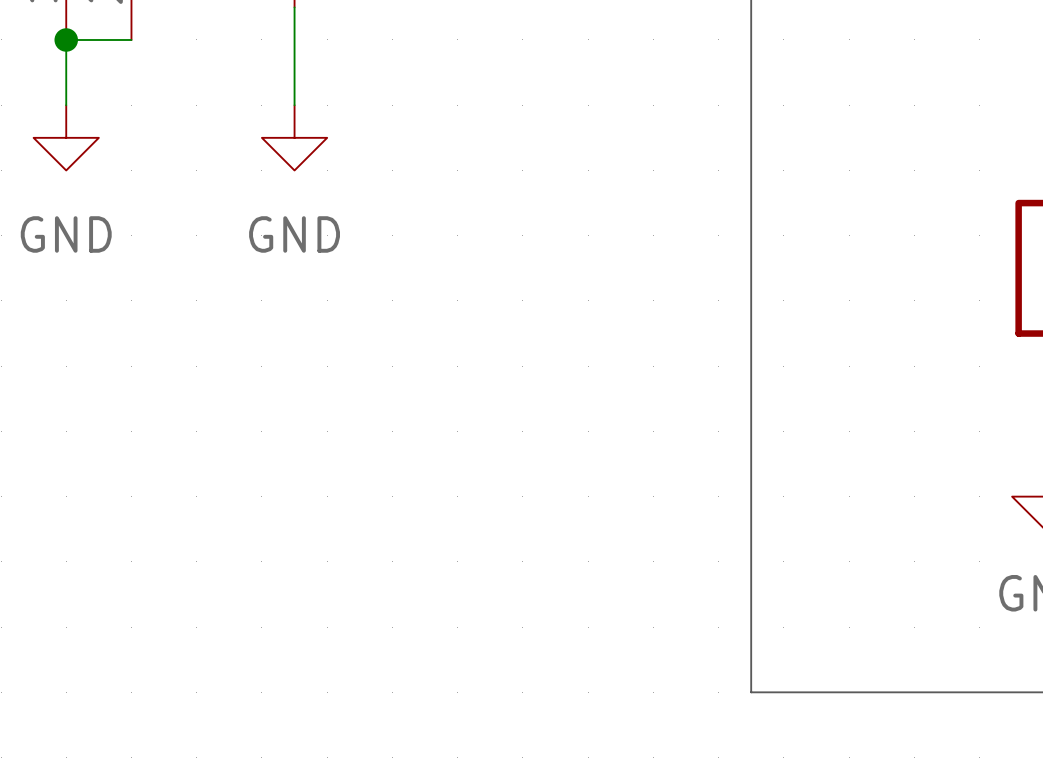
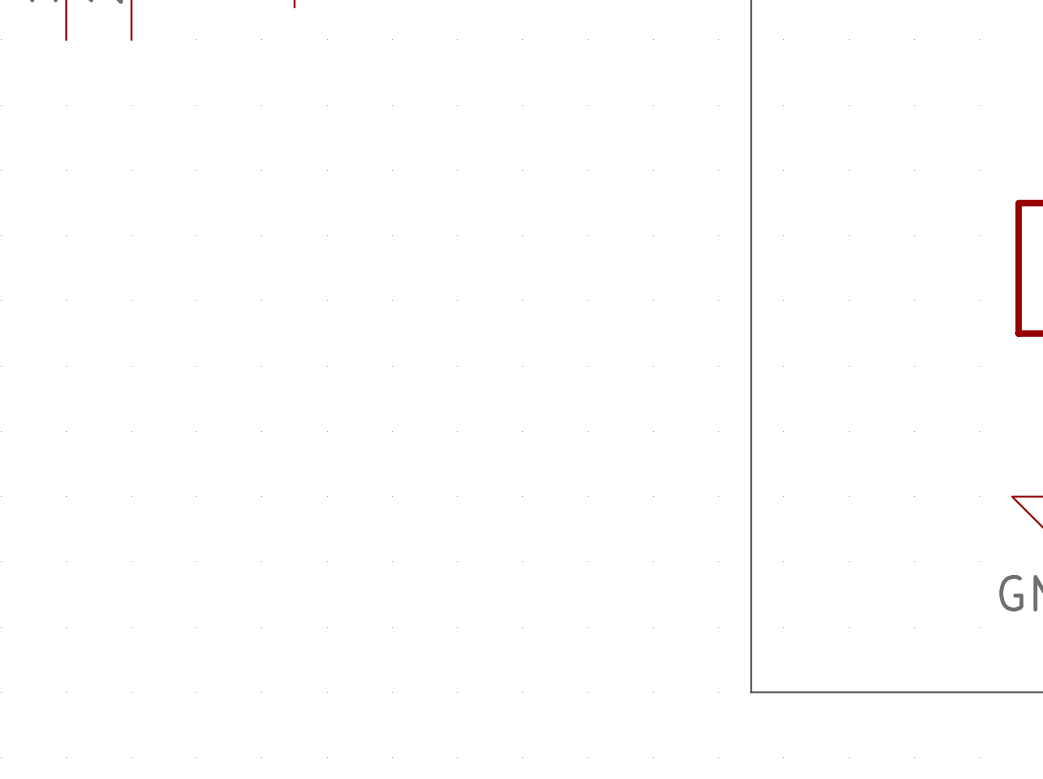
wire: (294, 7) (294, 105) -> none
junction: (66, 39) -> none
wire: (131, 39) (66, 39) (66, 105) -> none
power symbol: GND (66, 137) -> none
power symbol: GND (294, 137) -> none

